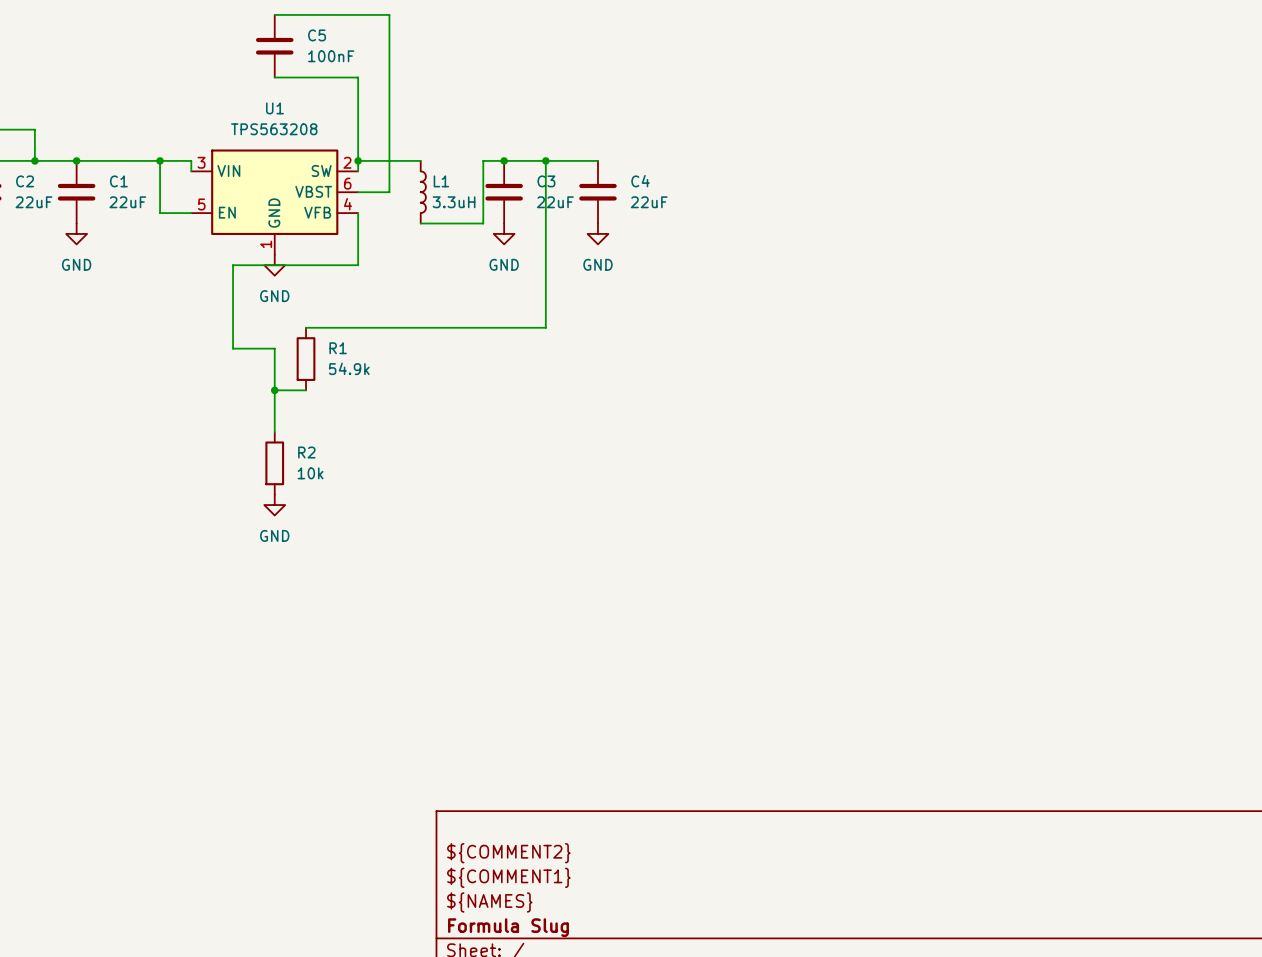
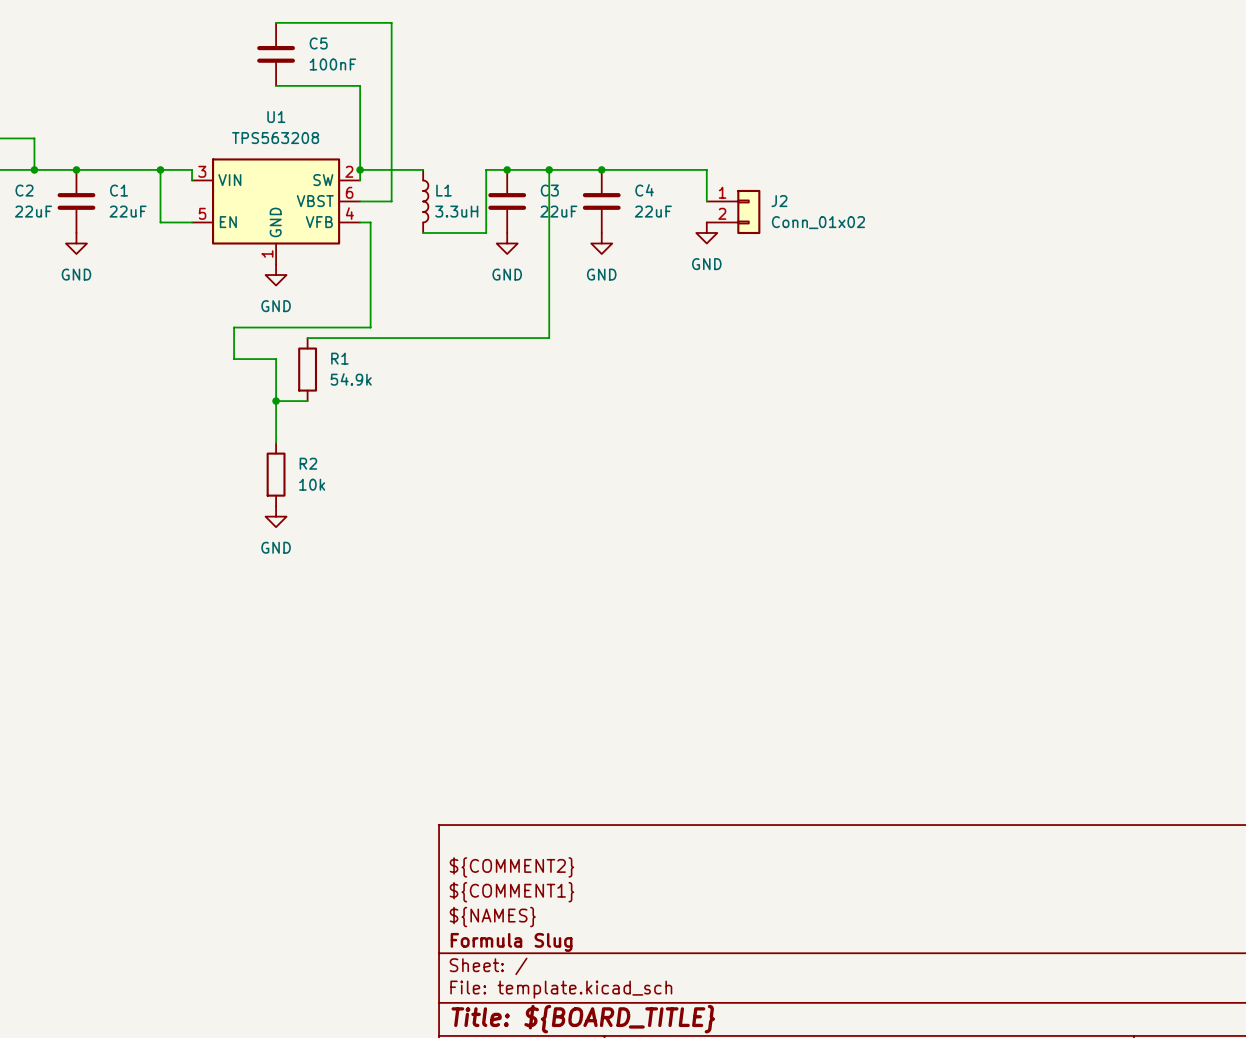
wire: none -> (601, 169) (706, 169) (706, 201)
junction: none -> (601, 169)
J2: none -> Conn_01x02 (733, 211)
wire: (358, 213) (358, 265) (233, 265) (233, 317) -> (360, 222) (370, 222) (370, 327) (234, 327)
power symbol: none -> GND (706, 232)

